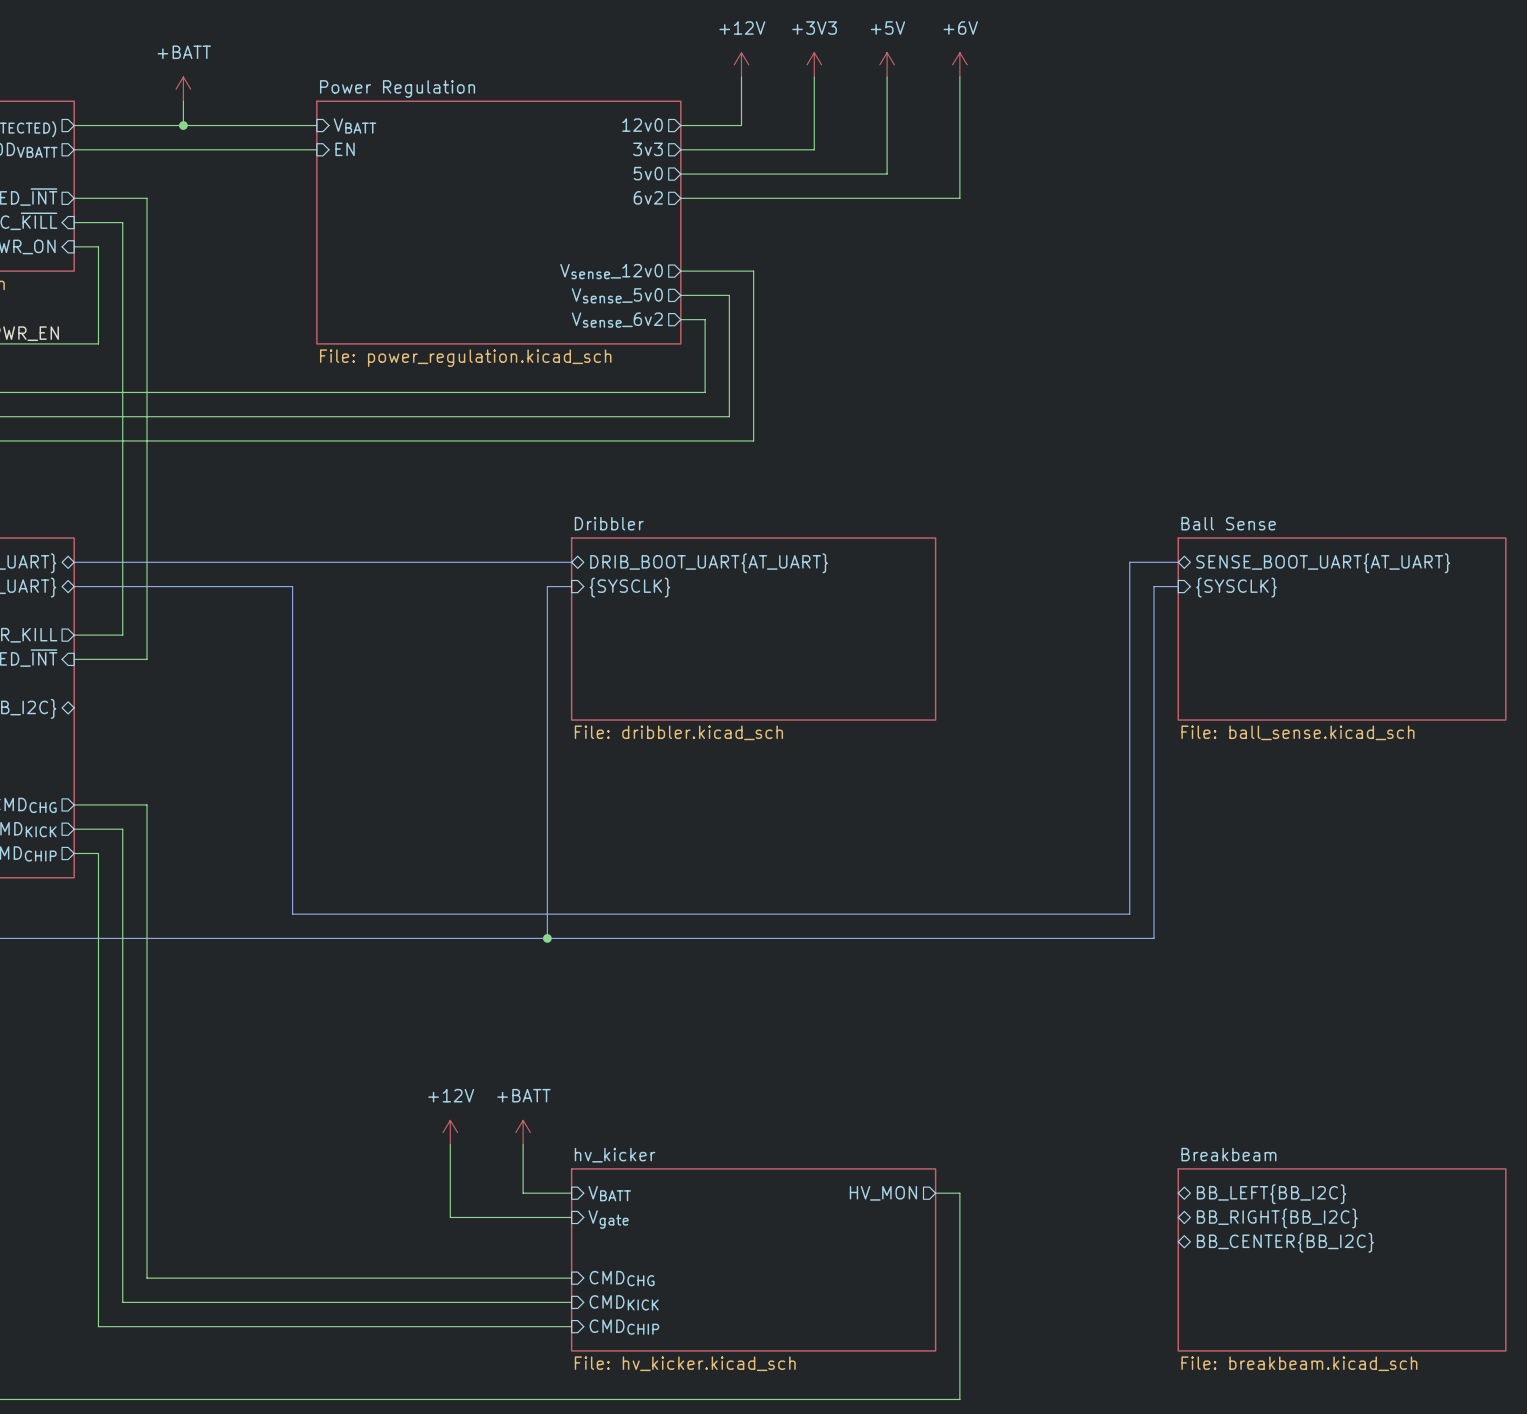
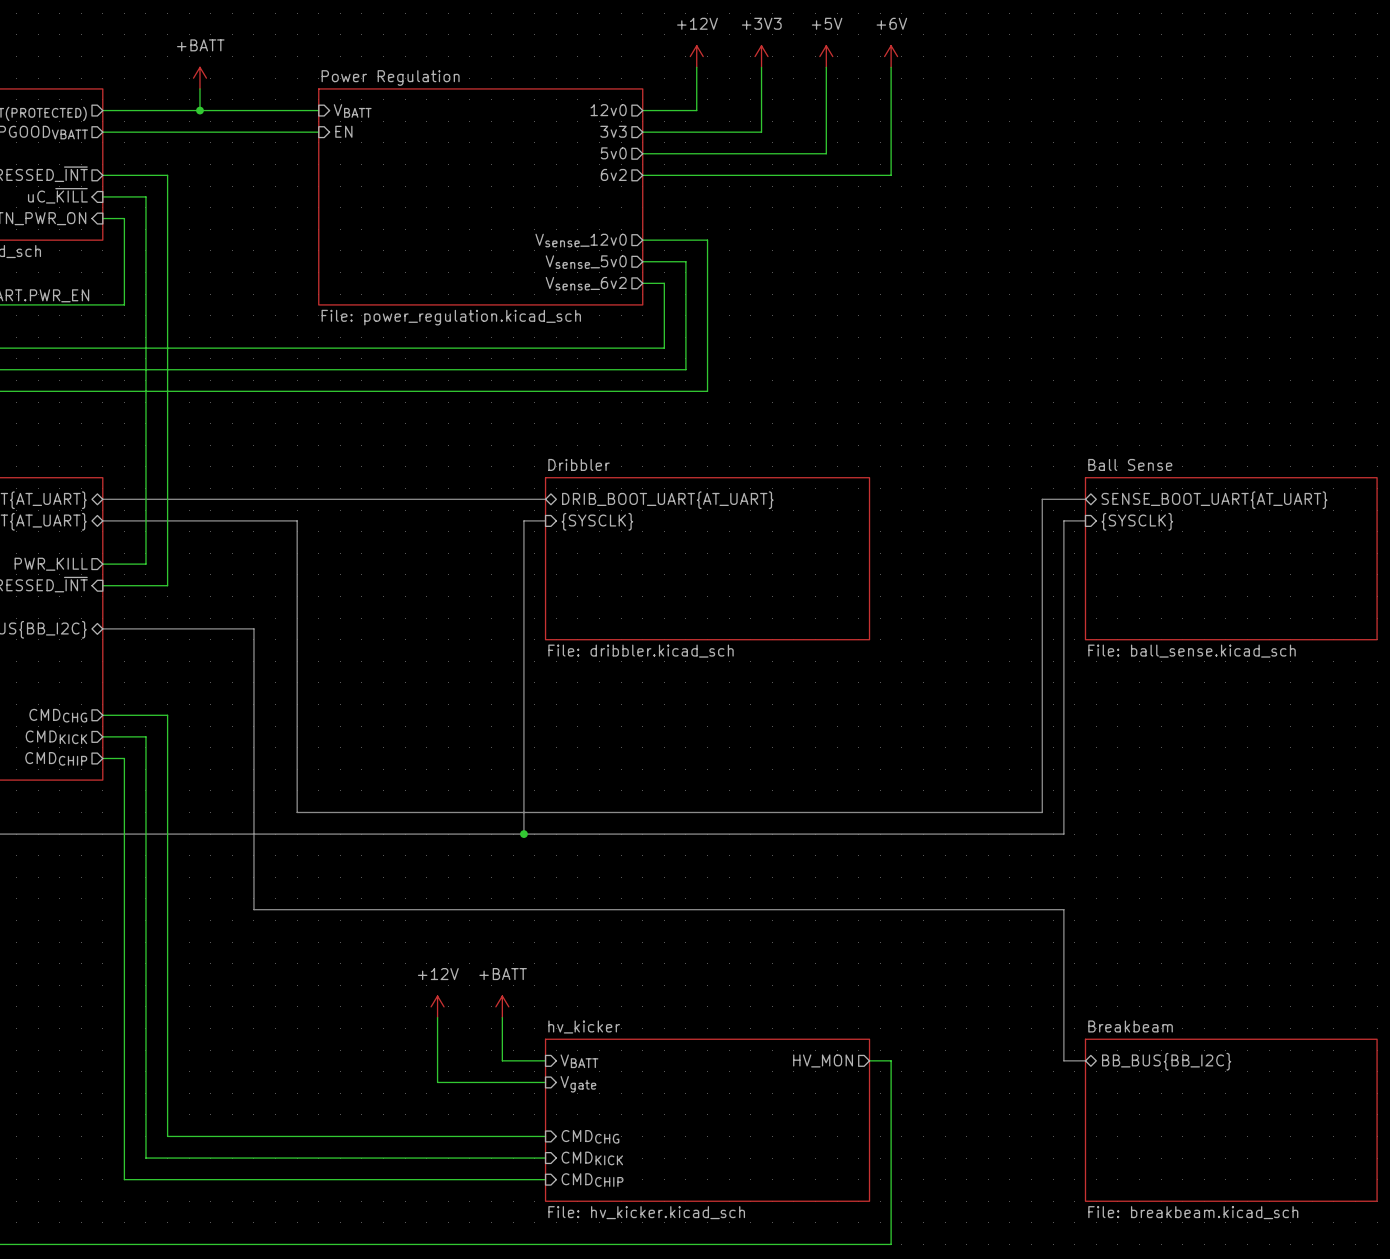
bus: none -> (102, 628) (253, 628) (253, 909) (1063, 909) (1063, 1060) (1085, 1060)
sheet pin: BB_LEFT{BB_I2C} (1271, 1194) -> BB_BUS{BB_I2C} (1166, 1061)
sheet pin: BB_RIGHT{BB_I2C} (1277, 1218) -> none
sheet pin: BB_CENTER{BB_I2C} (1285, 1242) -> none

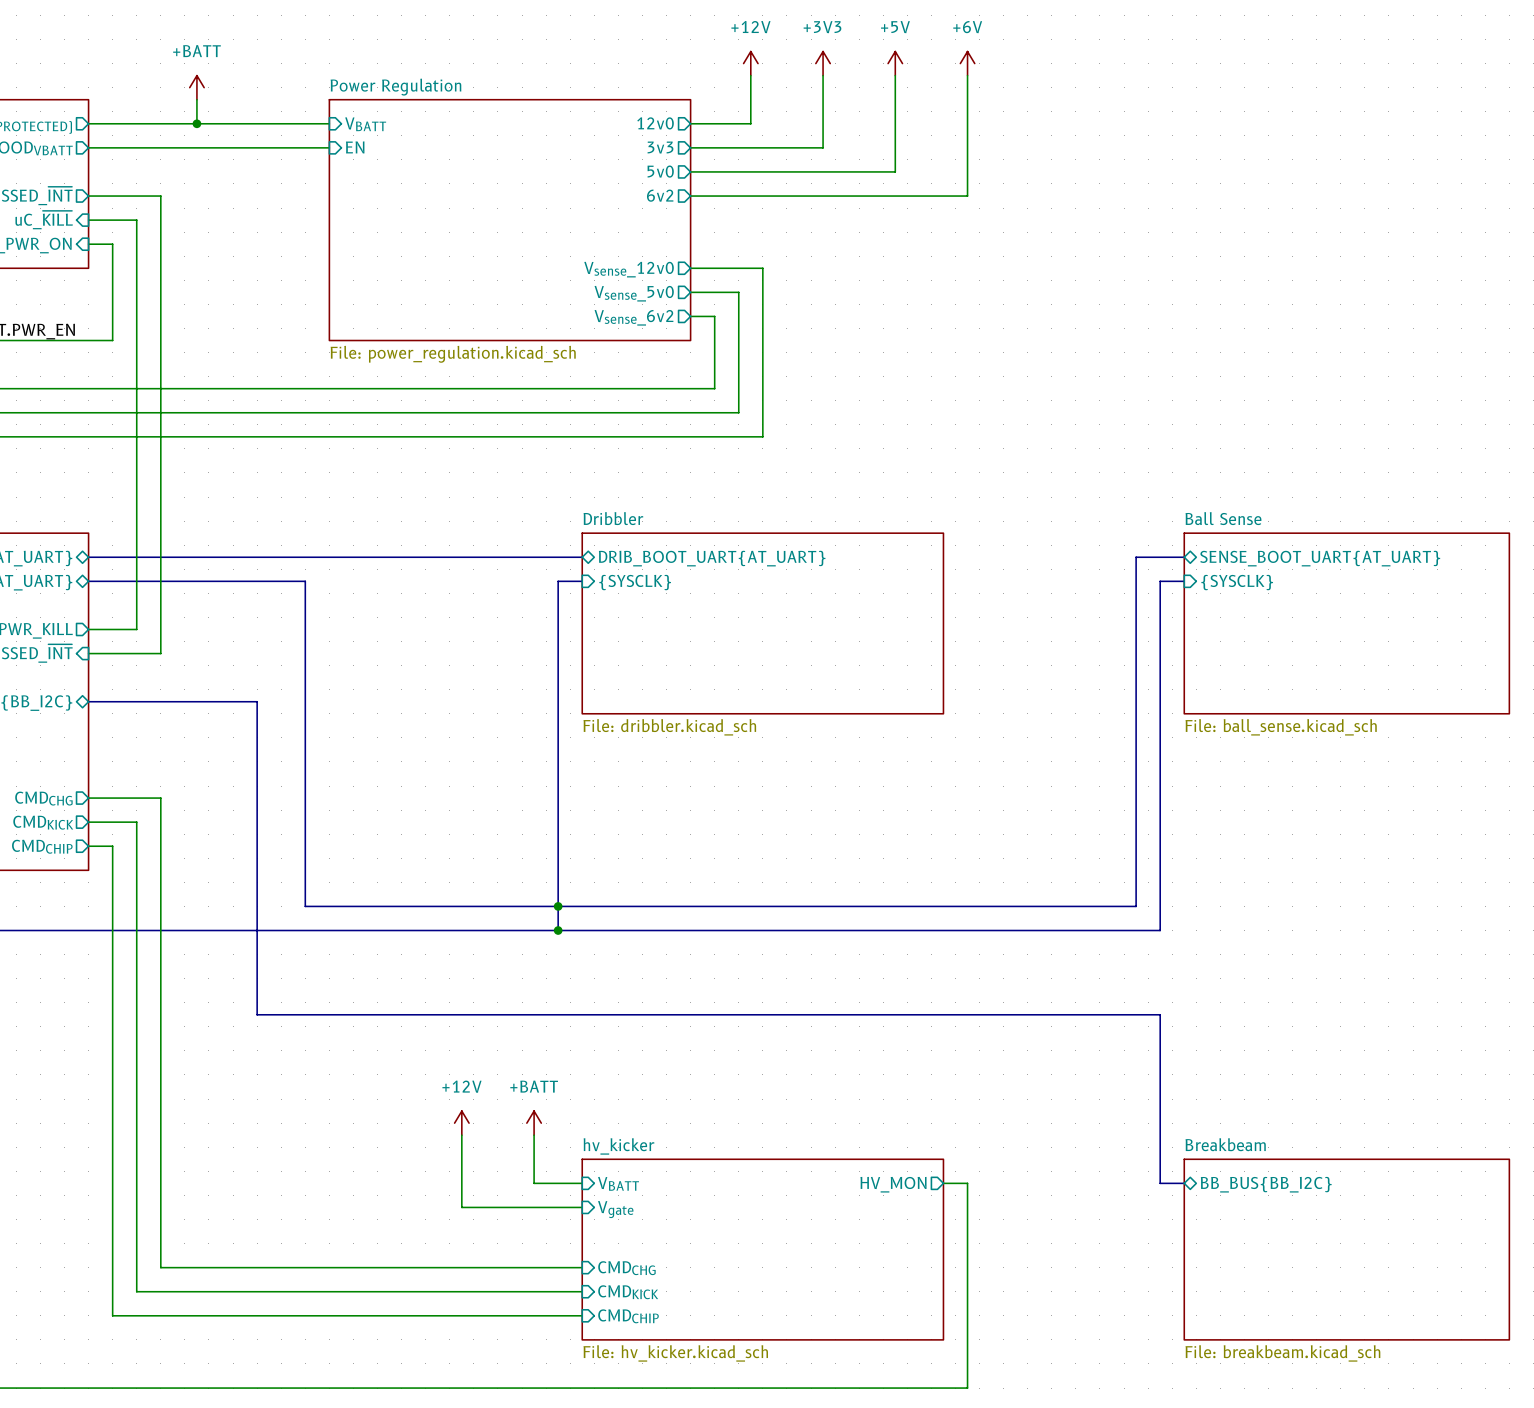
junction: none -> (558, 906)

